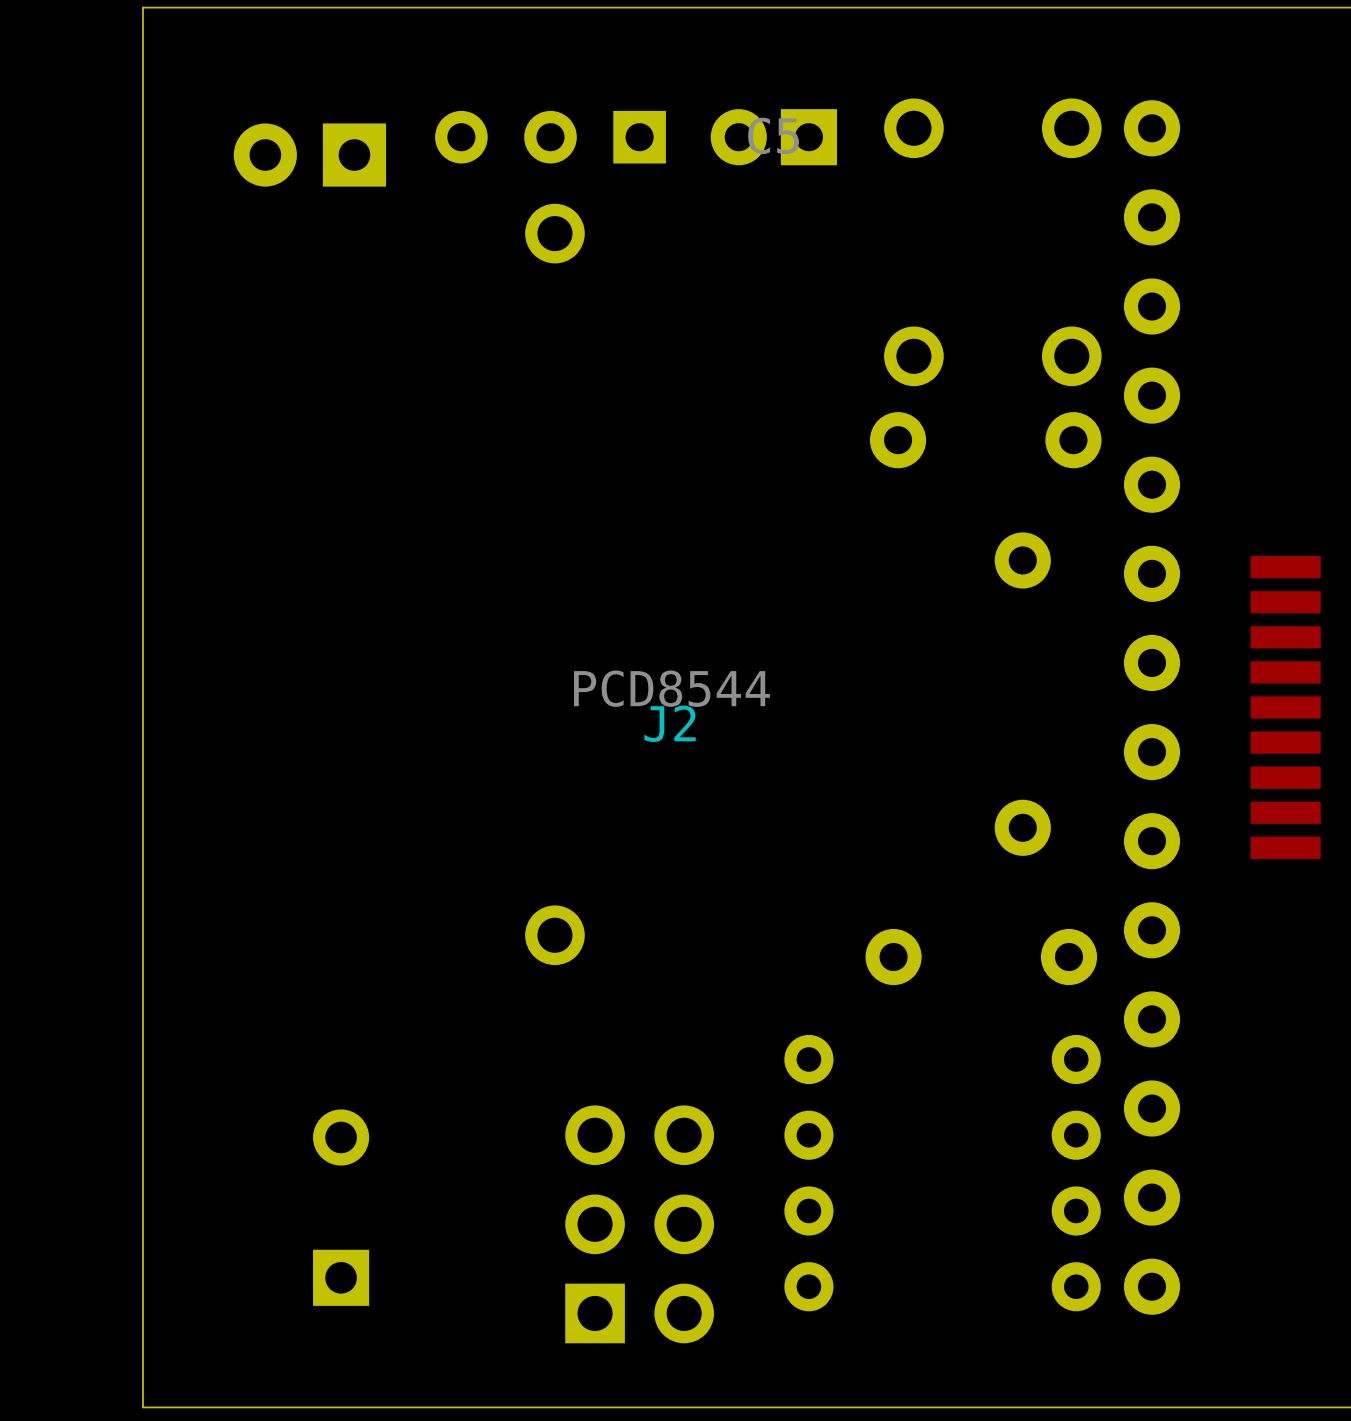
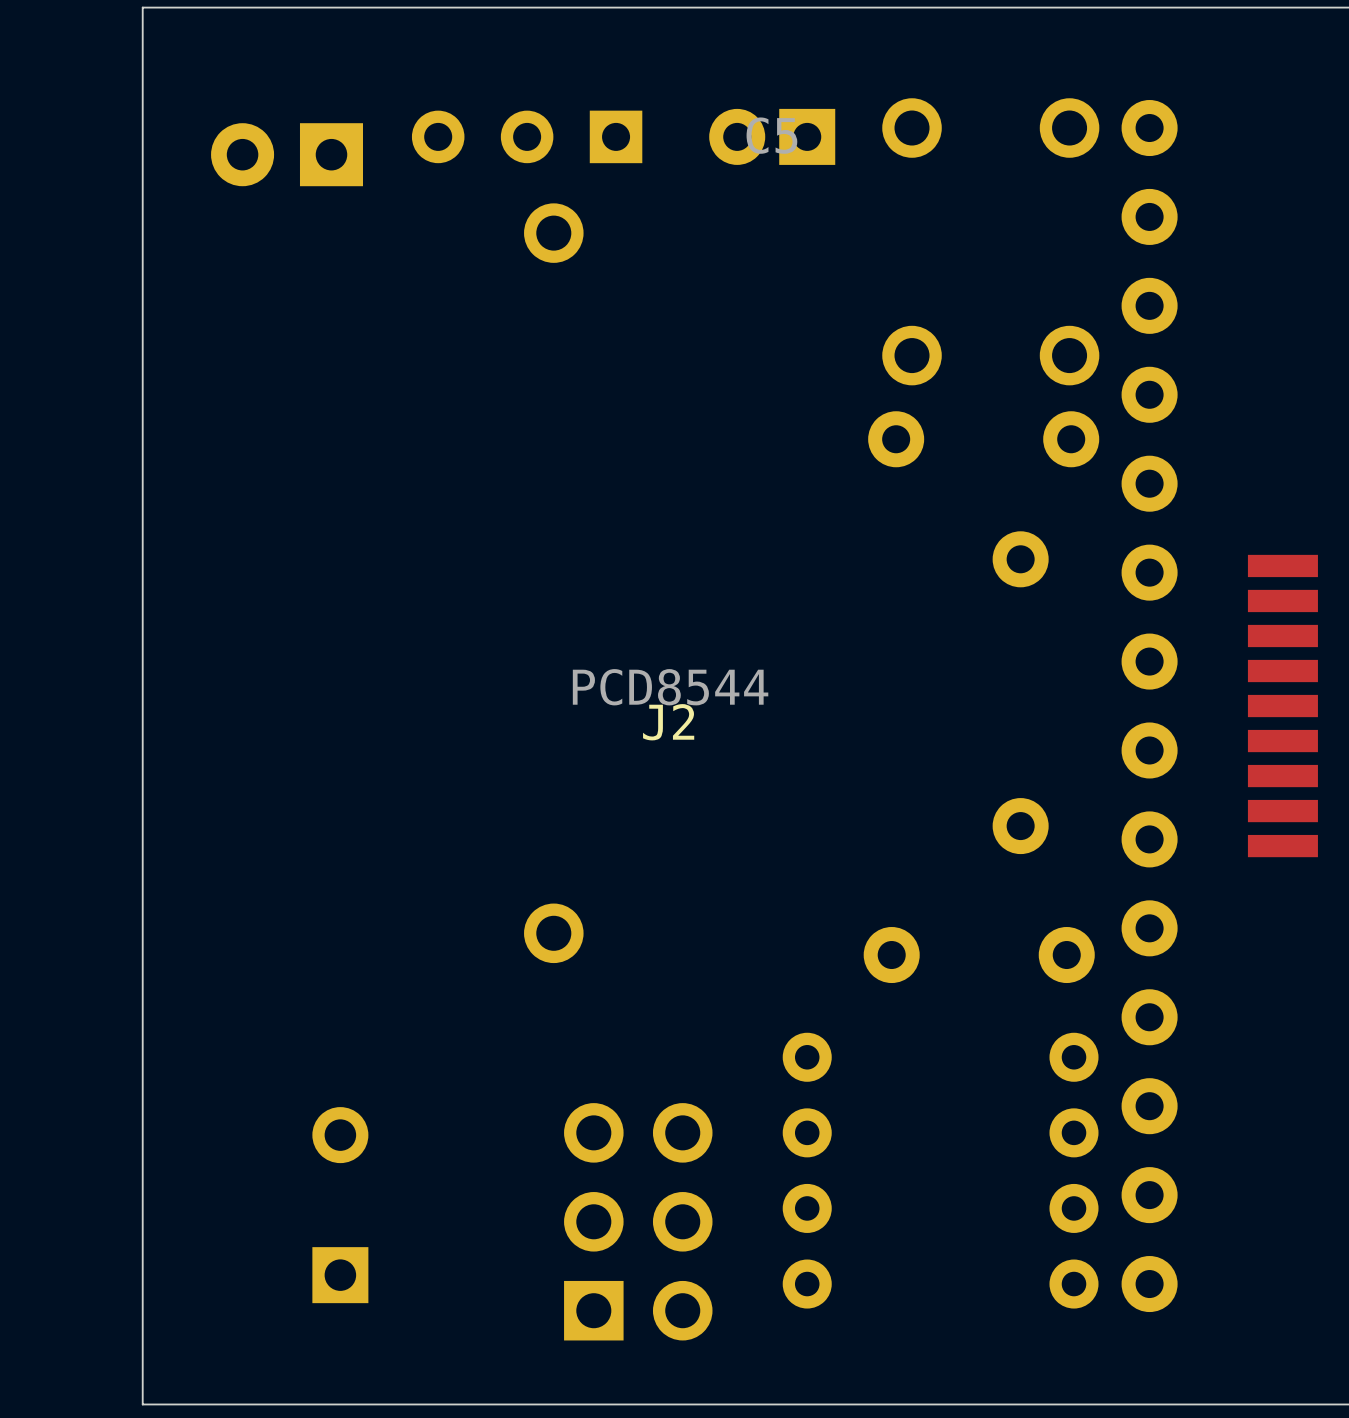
part position: (550, 137) -> (527, 136)
part position: (309, 155) -> (287, 154)

